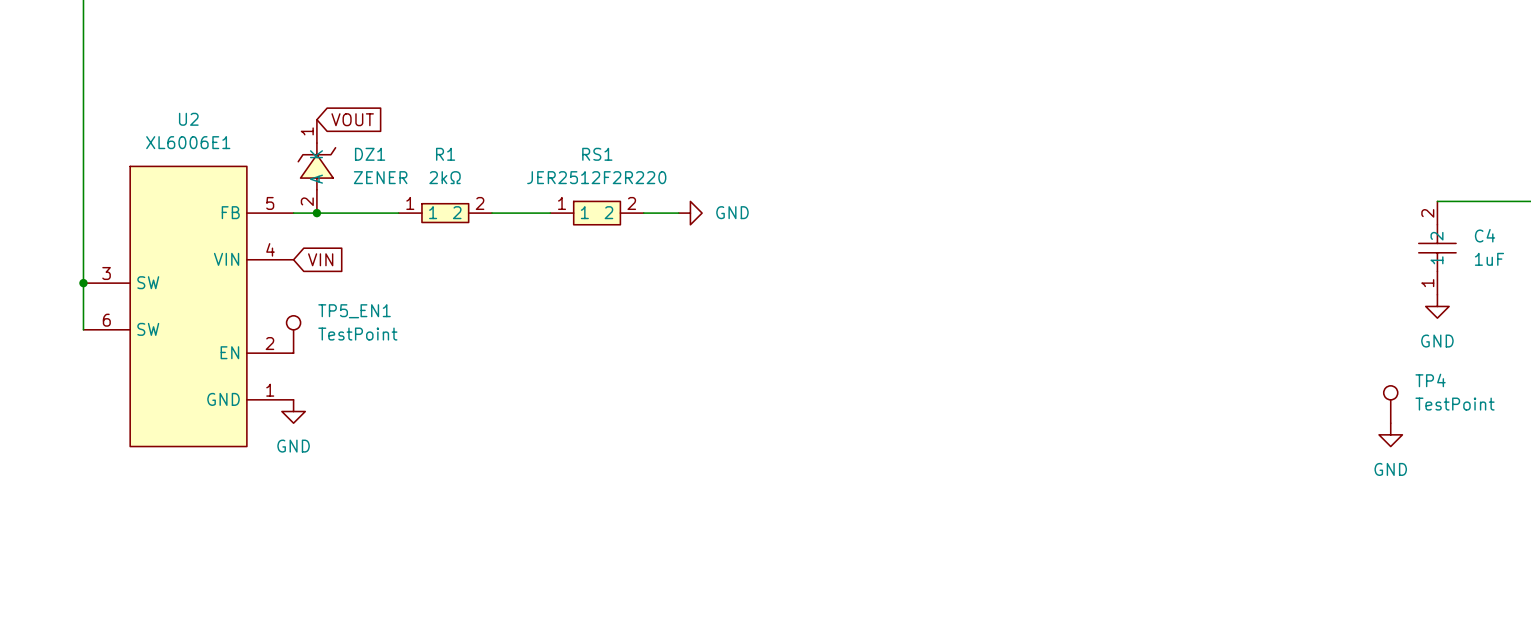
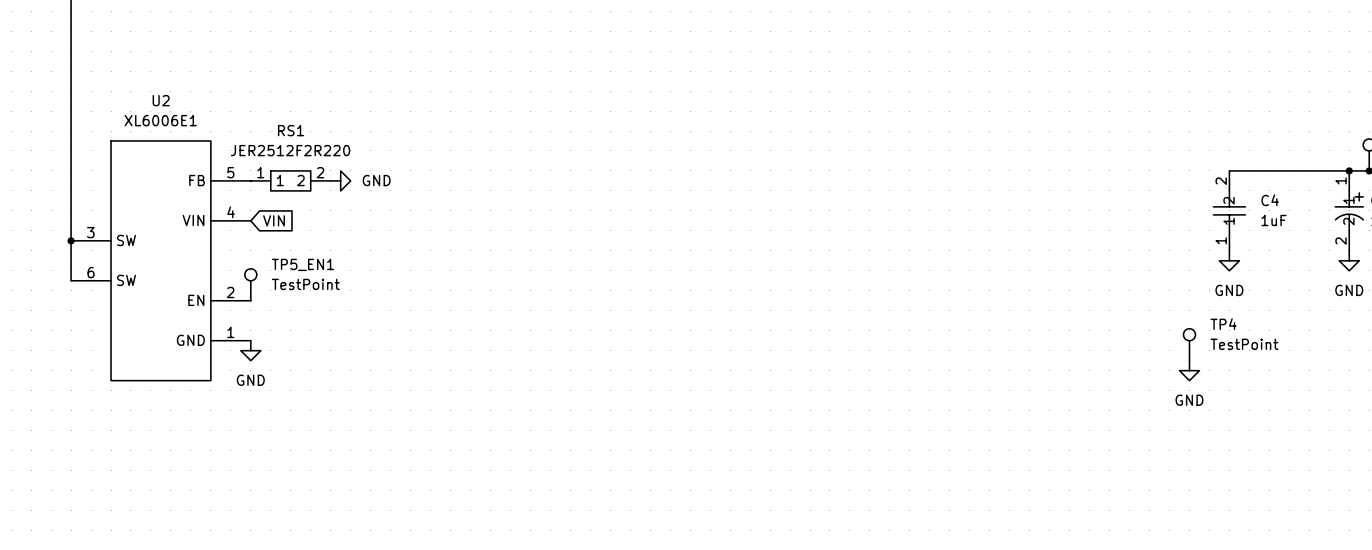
global label: VOUT (352, 119) -> none
DZ1: ZENER (316, 166) -> none
junction: (316, 213) -> none
power symbol: none -> GND (340, 180)
R1: 2kΩ (445, 213) -> none
wire: (492, 213) (550, 213) -> none
RS1 position: (597, 213) -> (290, 180)
wire: (643, 213) (678, 213) -> none
power symbol: GND (690, 213) -> none

